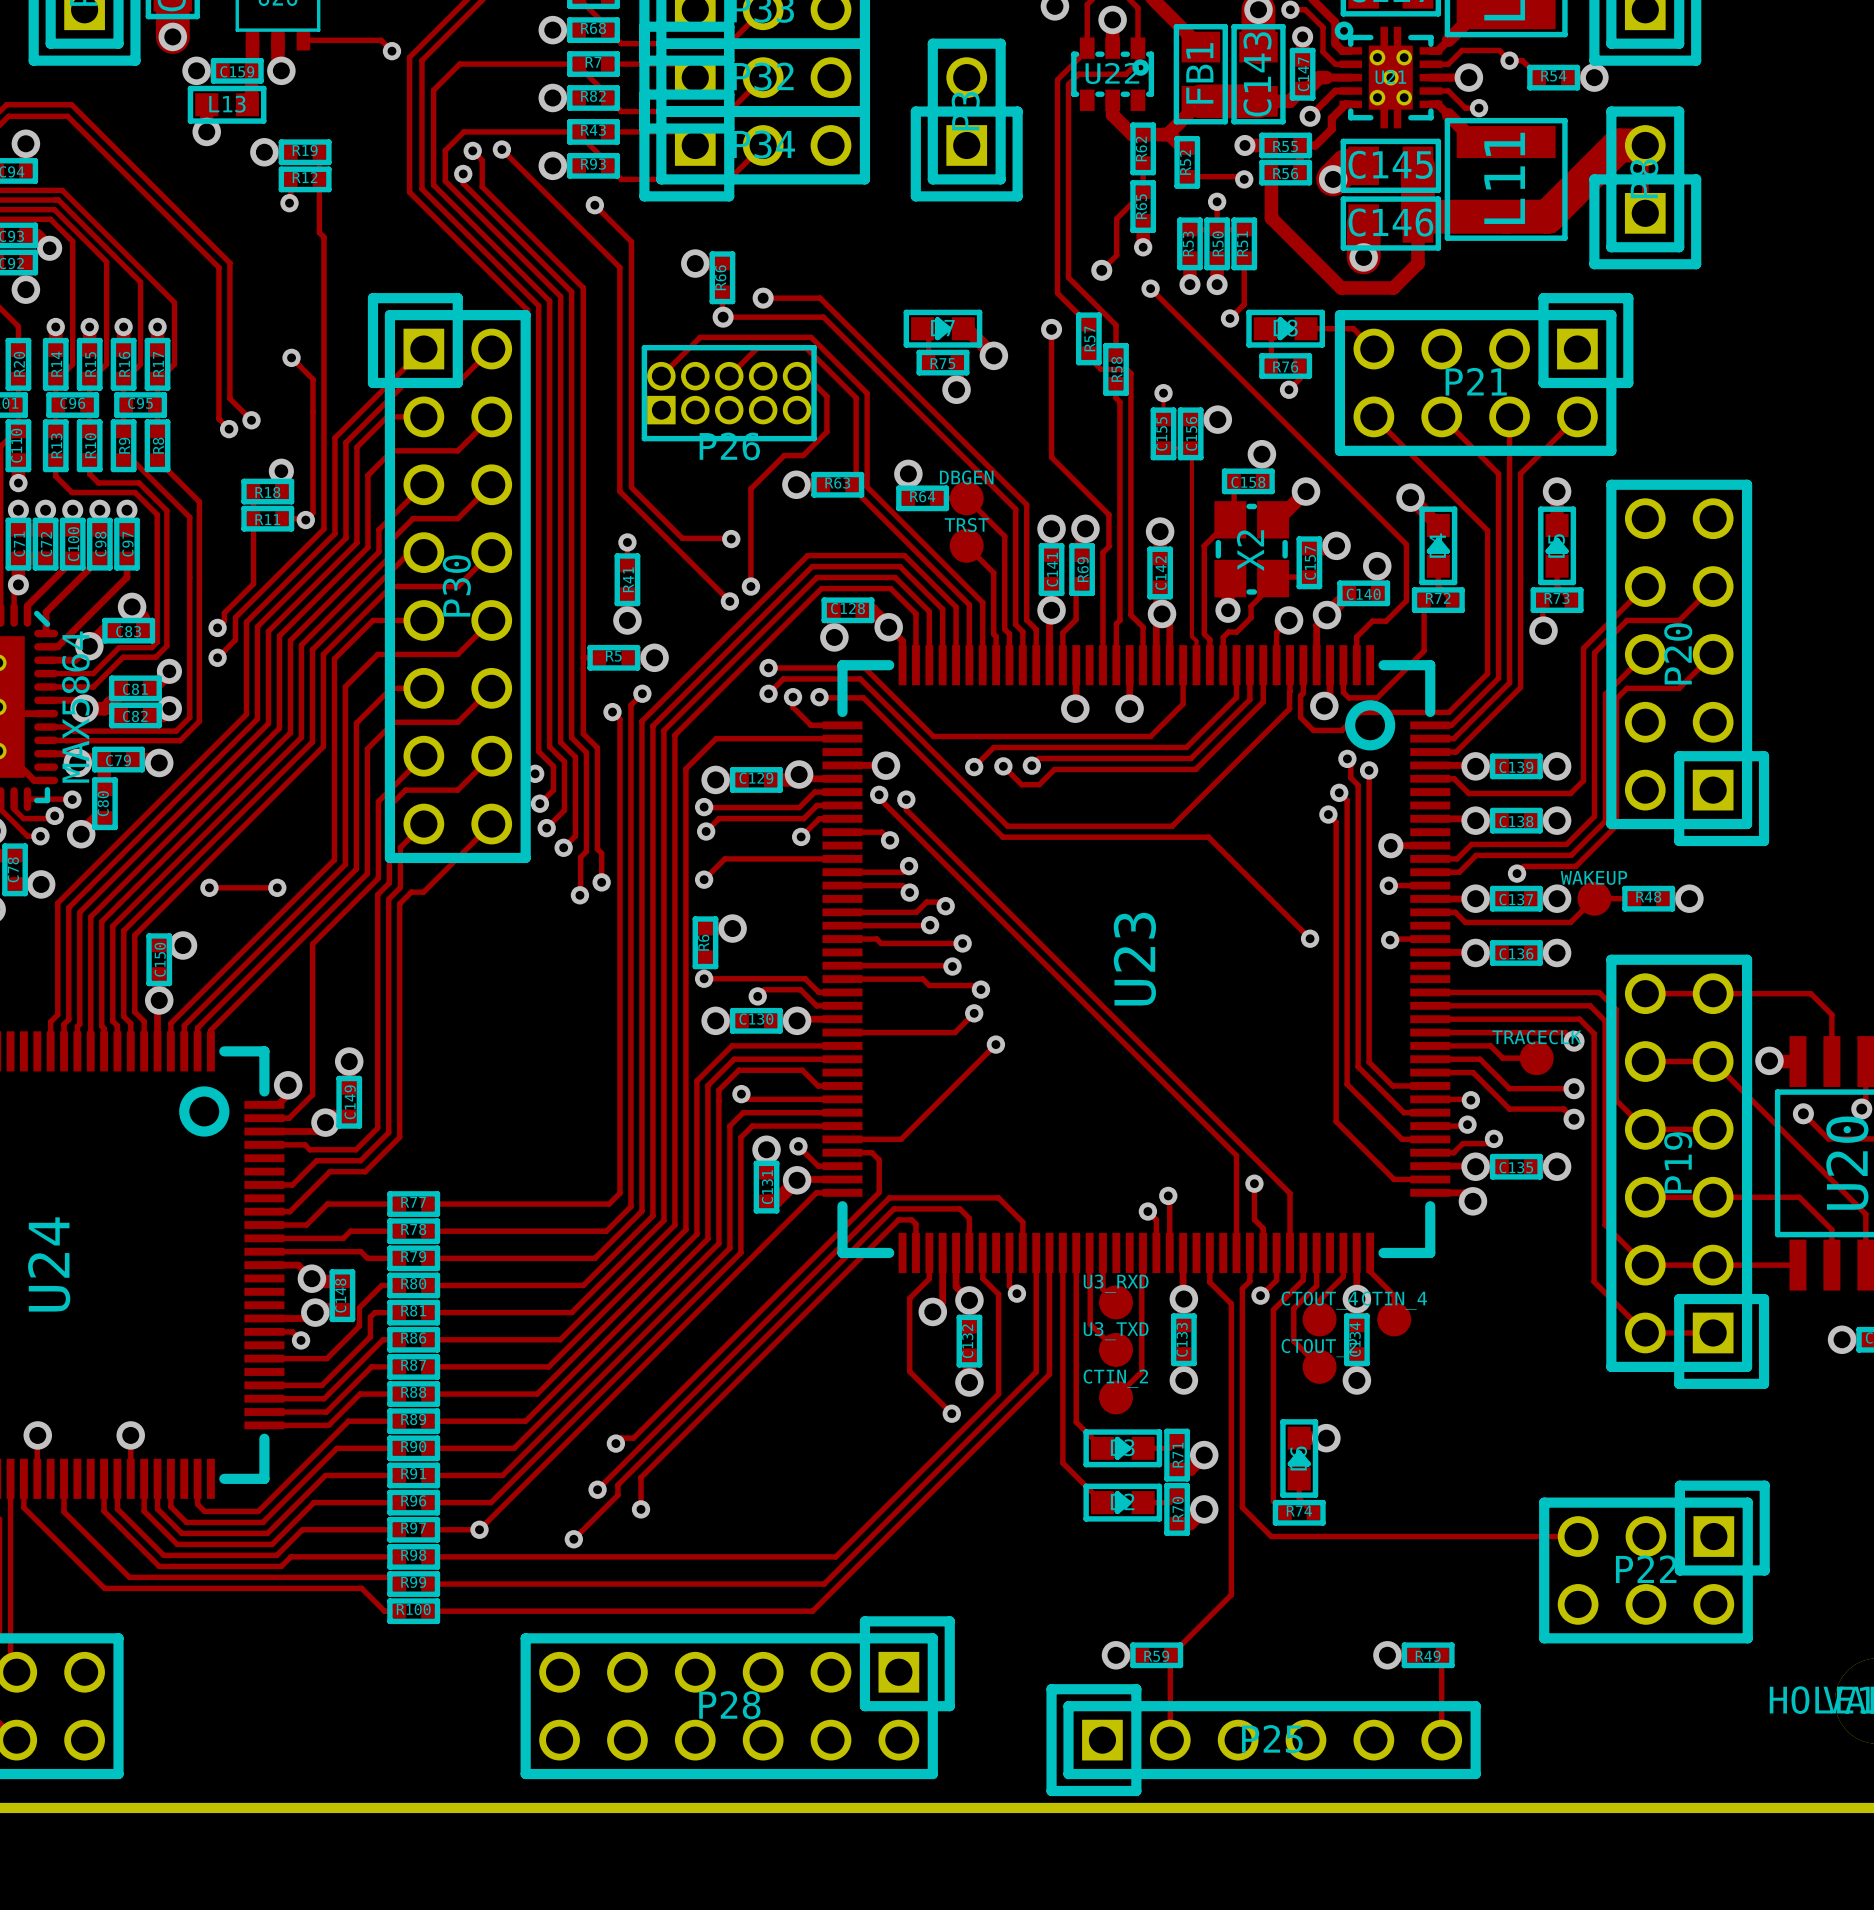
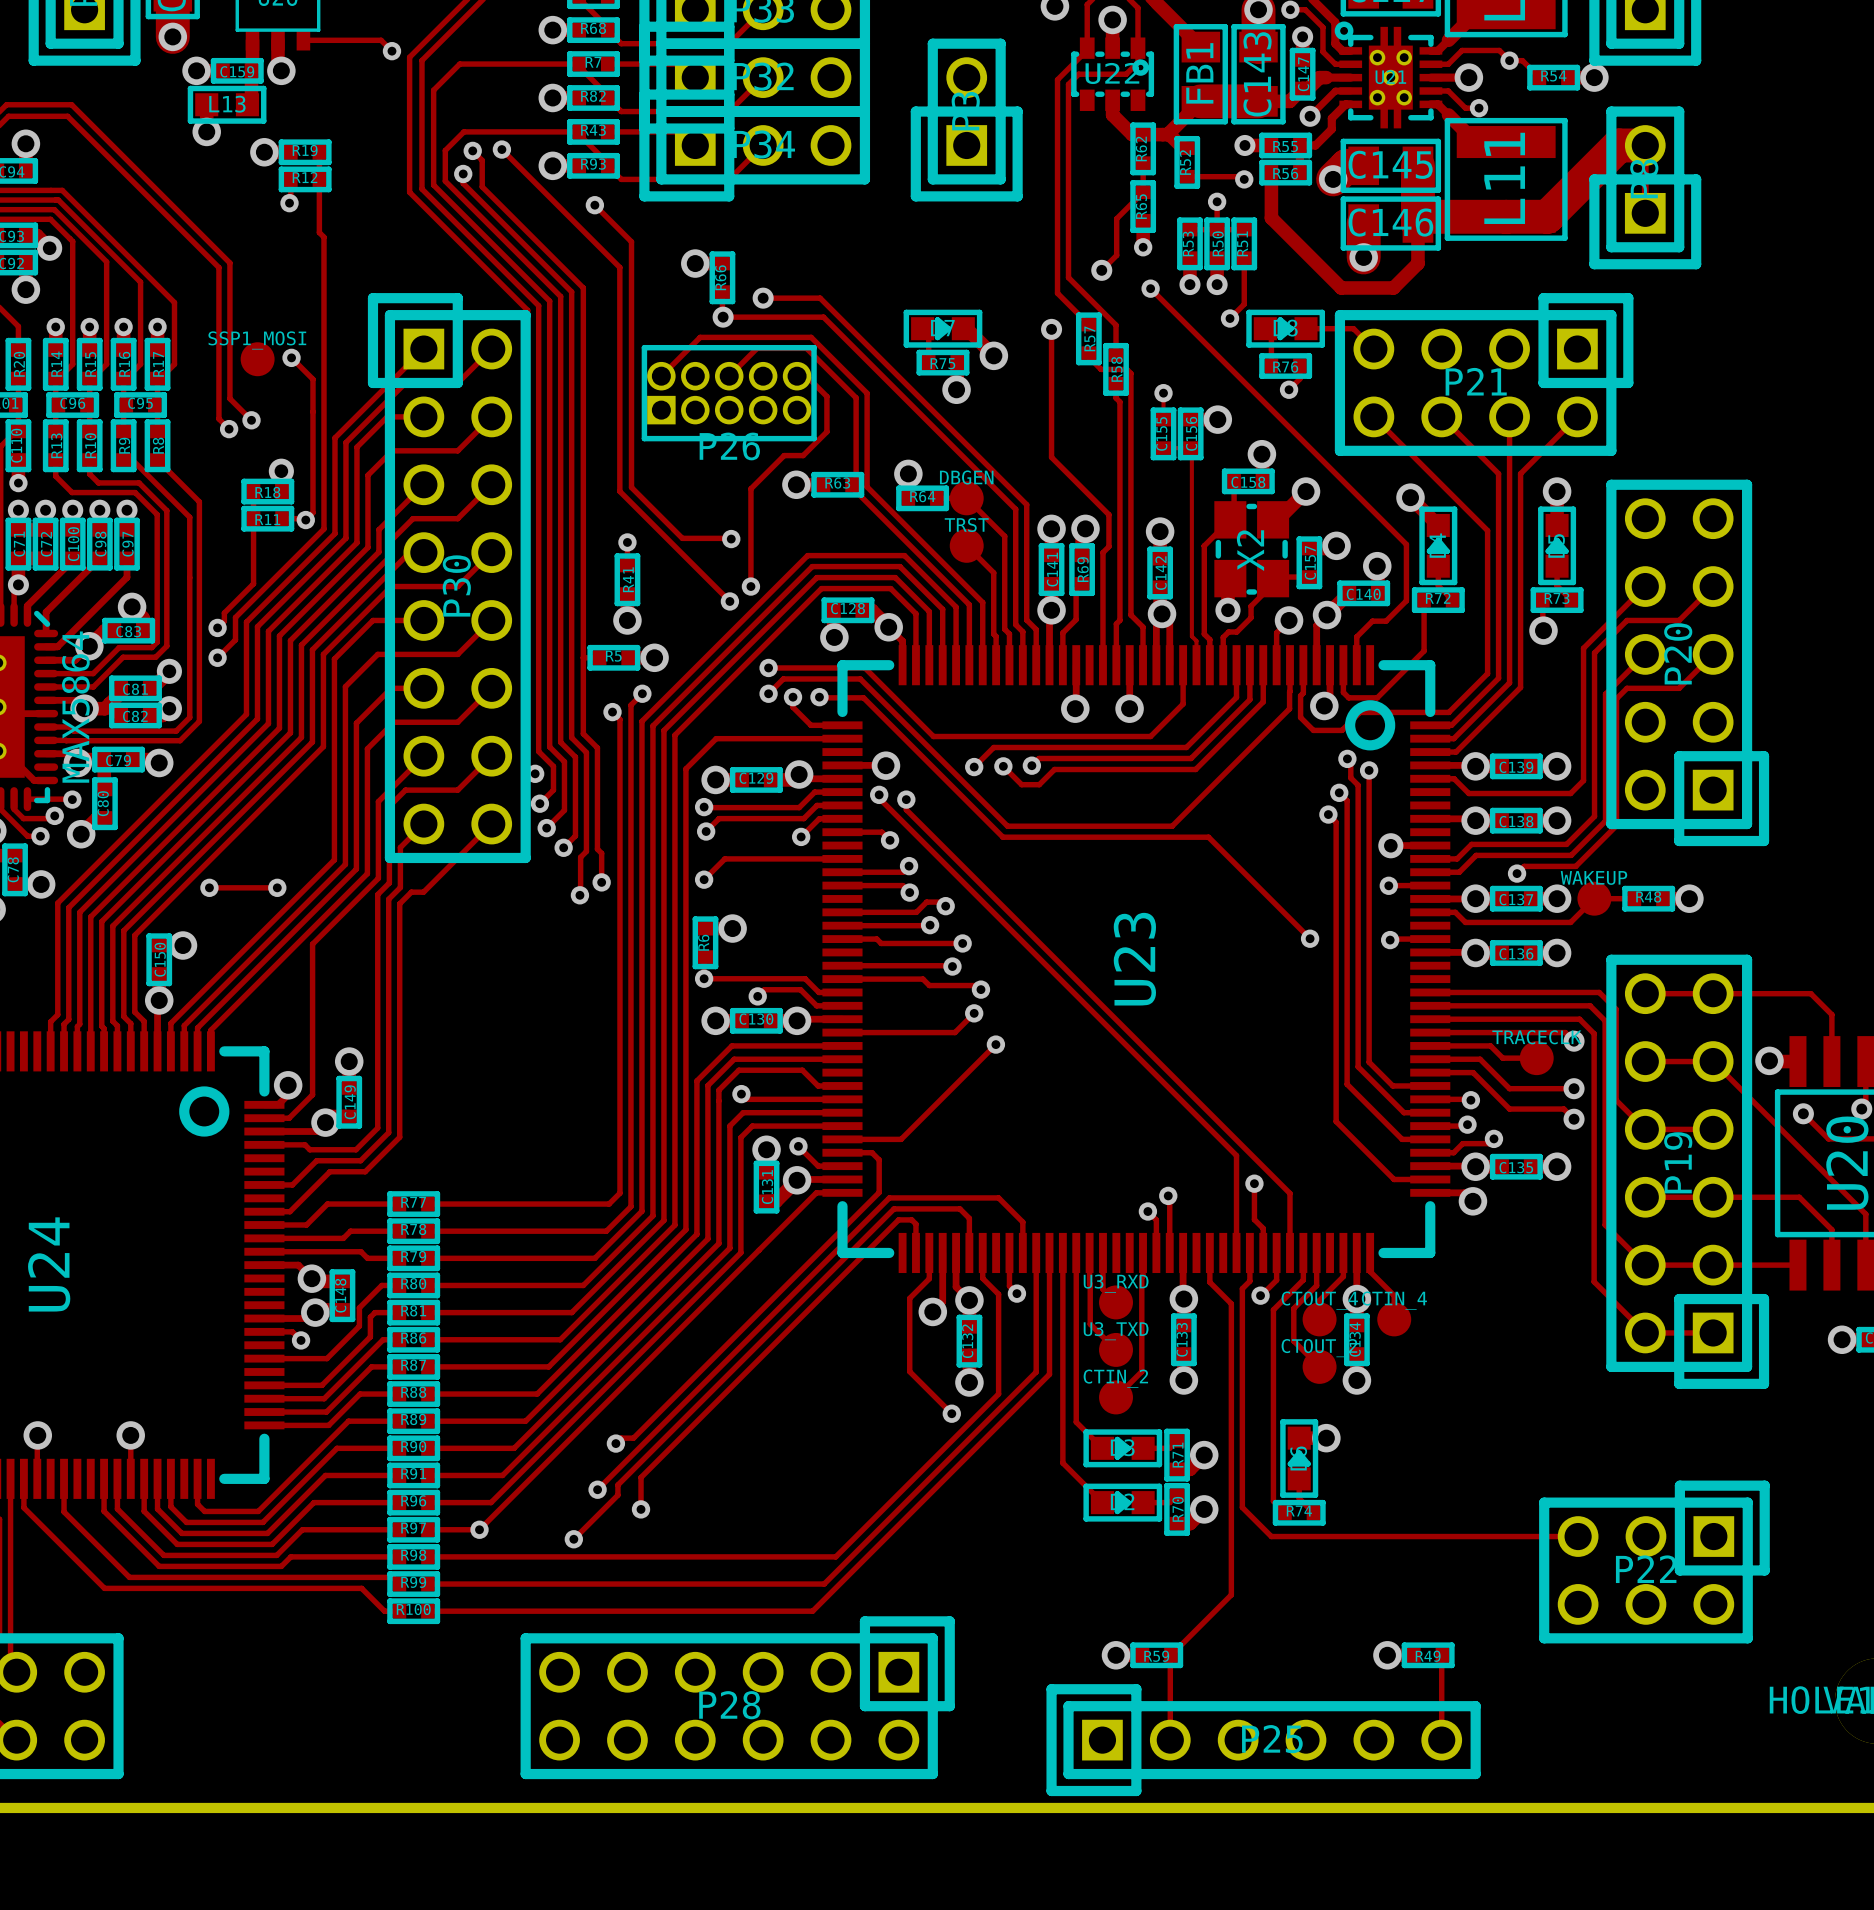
part: none -> SSP1_MOSI (257, 359)

